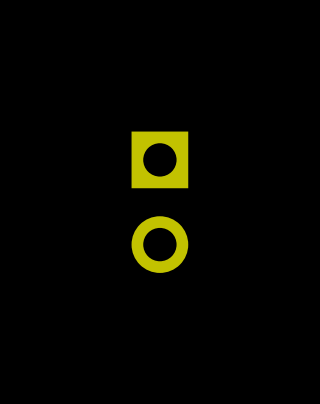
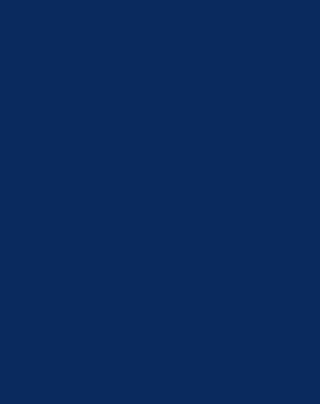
part: (159, 202) -> none

